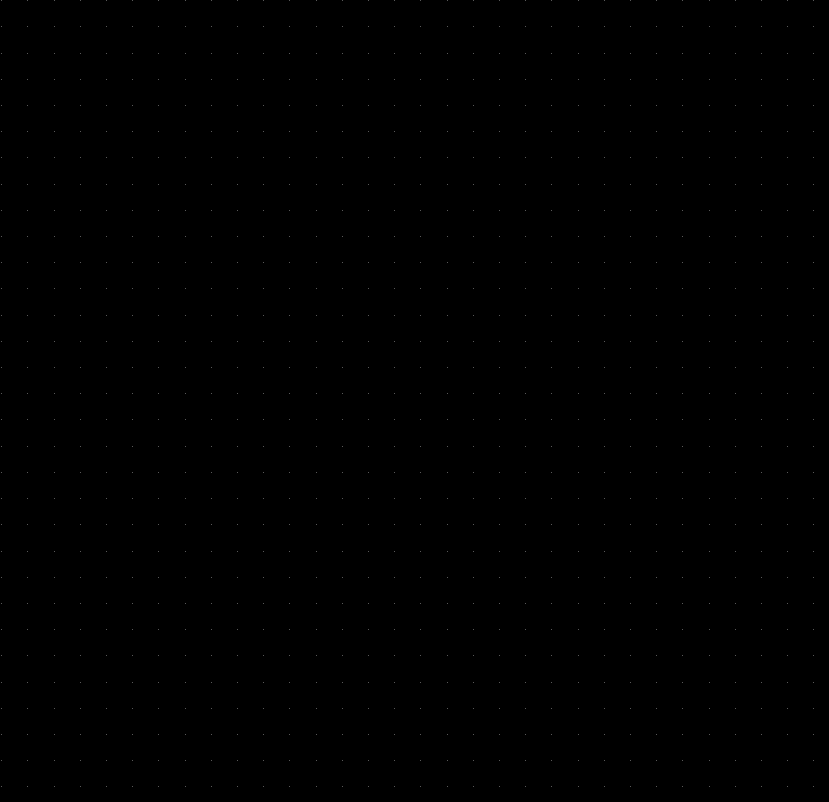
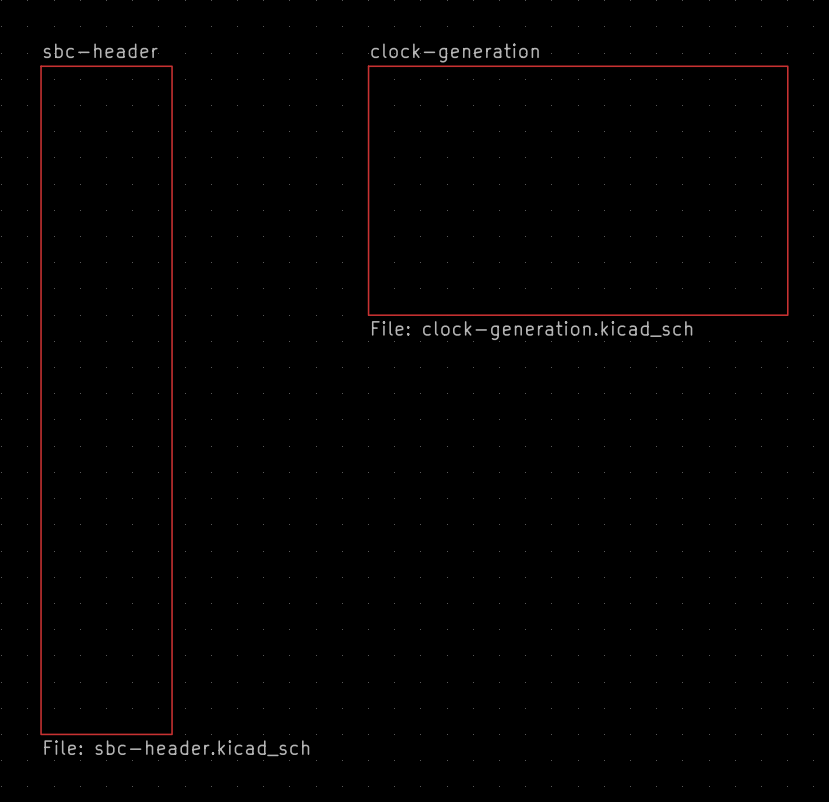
sheet clock-generation: none -> File: clock-generation.kicad_sch (578, 190)
sheet sbc-header: none -> File: sbc-header.kicad_sch (106, 400)

